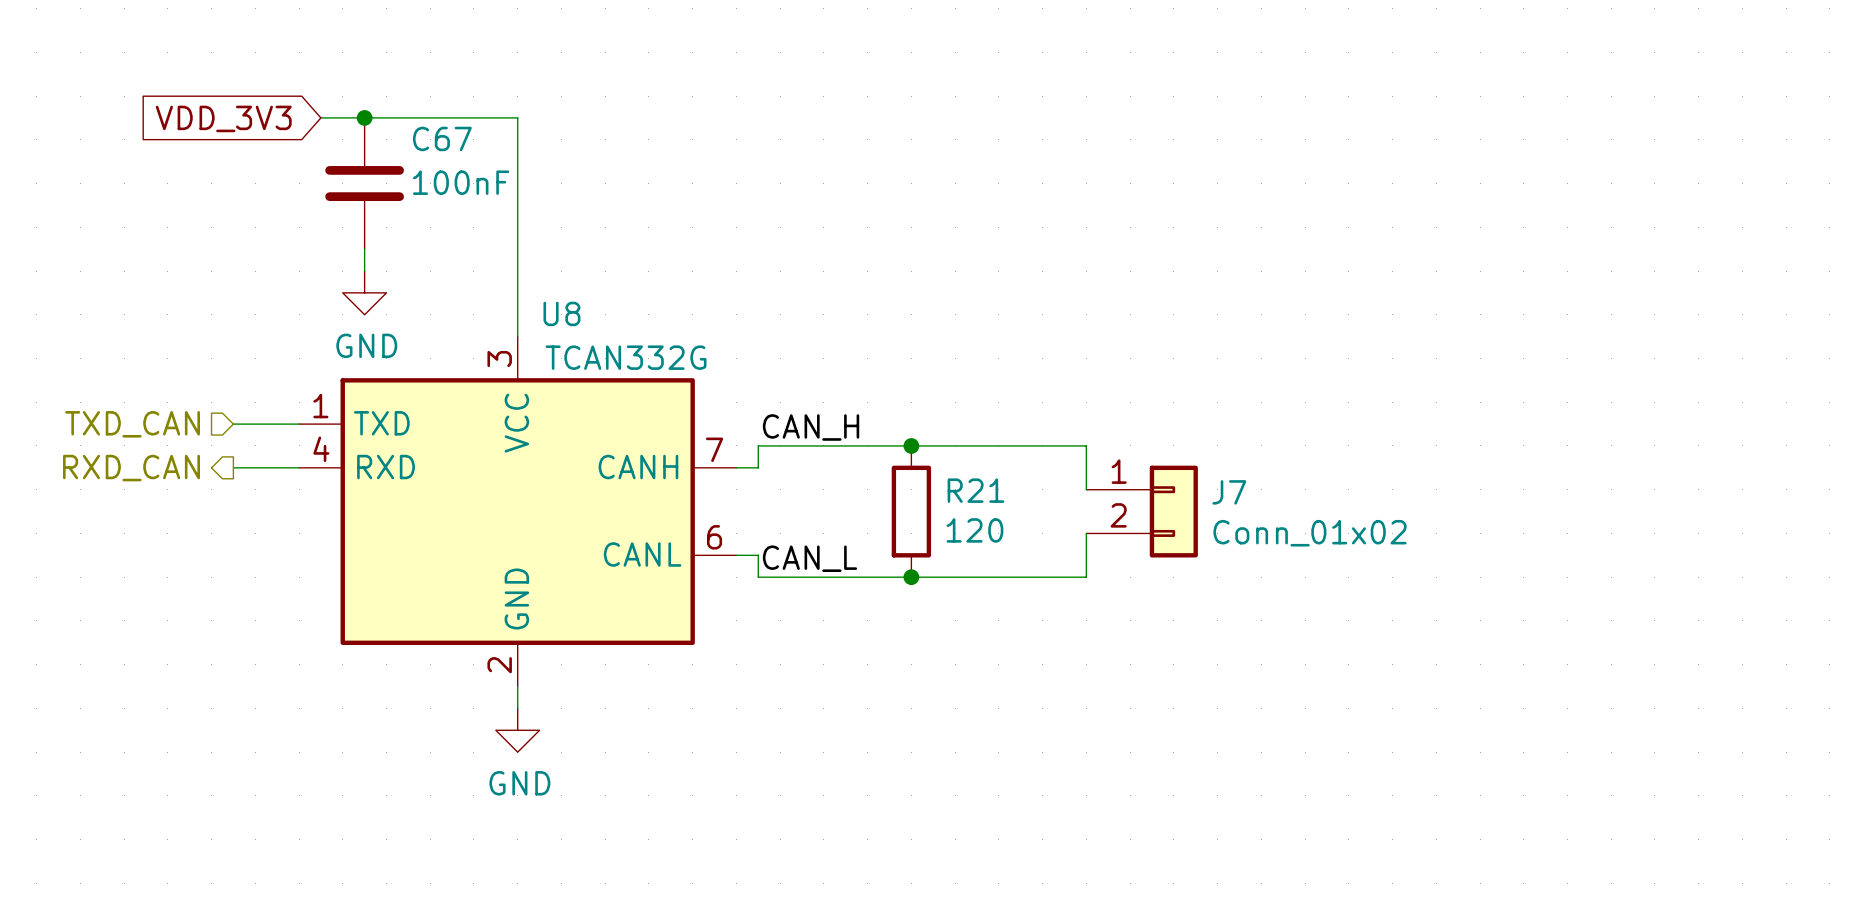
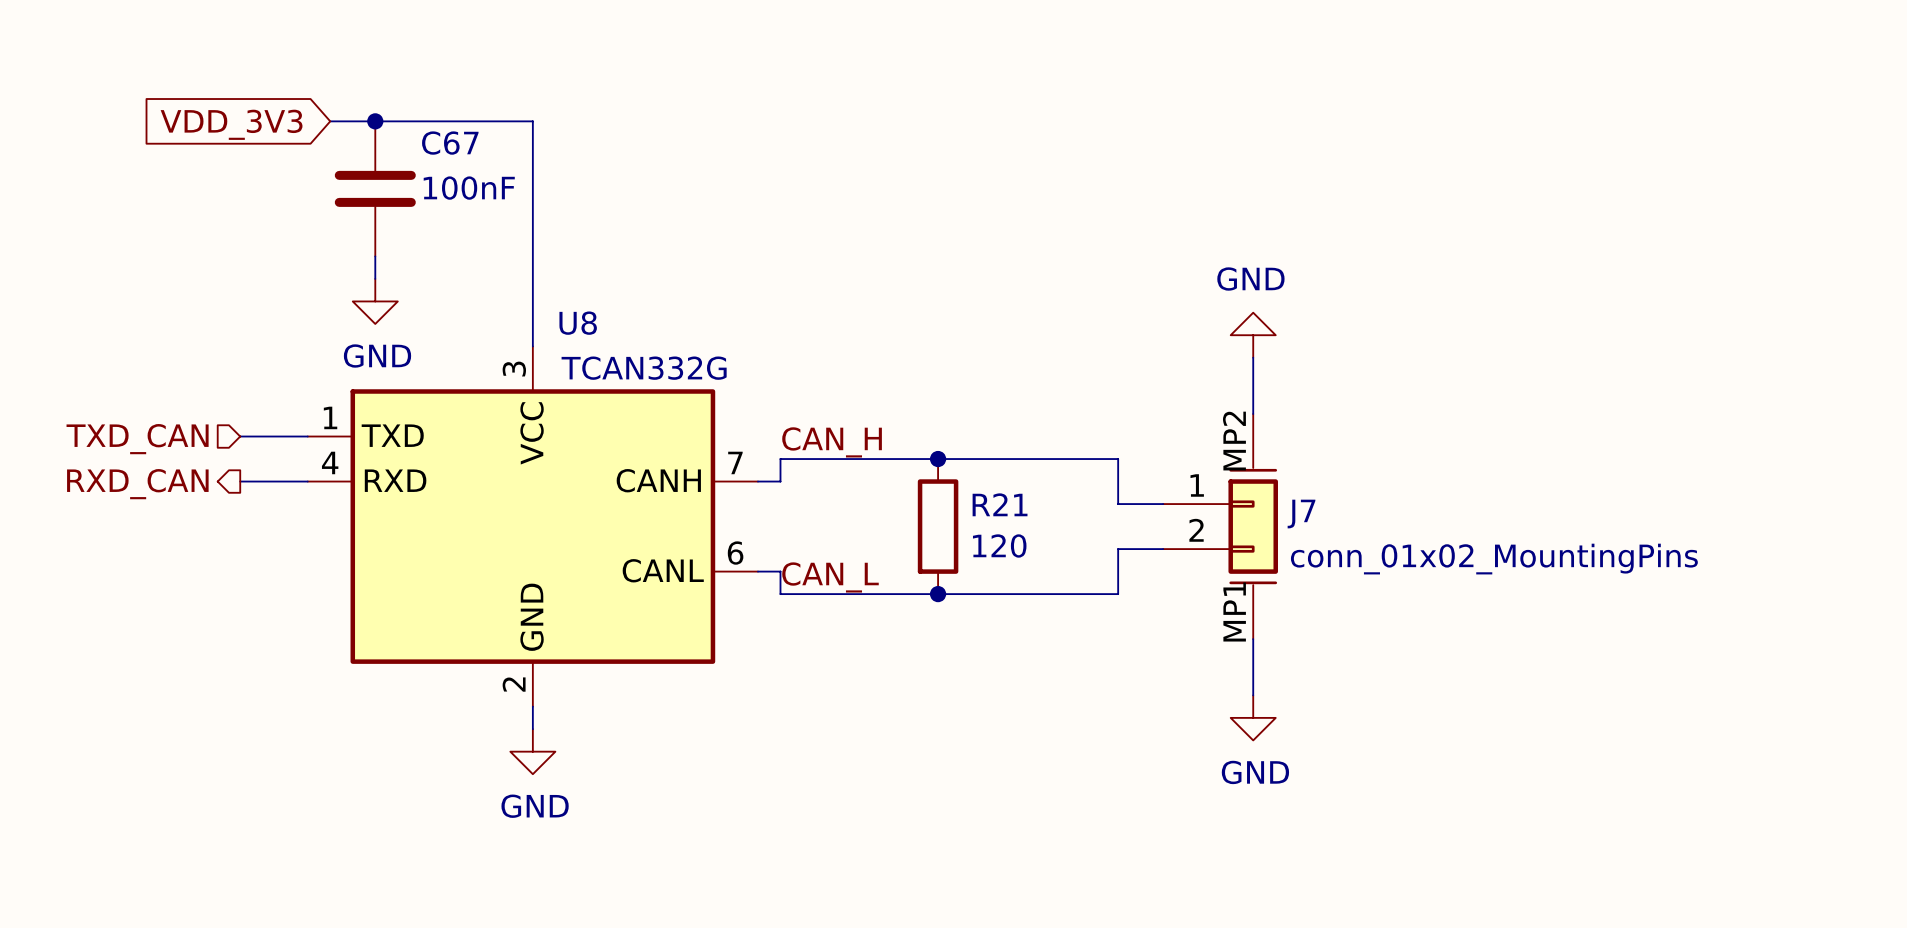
power symbol: none -> GND (1253, 335)
wire: none -> (1253, 357) (1253, 414)
J7 symbol: [1086, 465, 1198, 558] -> [1163, 414, 1278, 640]
J7 value: Conn_01x02 (1310, 533) -> conn_01x02_MountingPins (1494, 559)
wire: none -> (1253, 639) (1253, 695)
power symbol: none -> GND (1253, 717)

